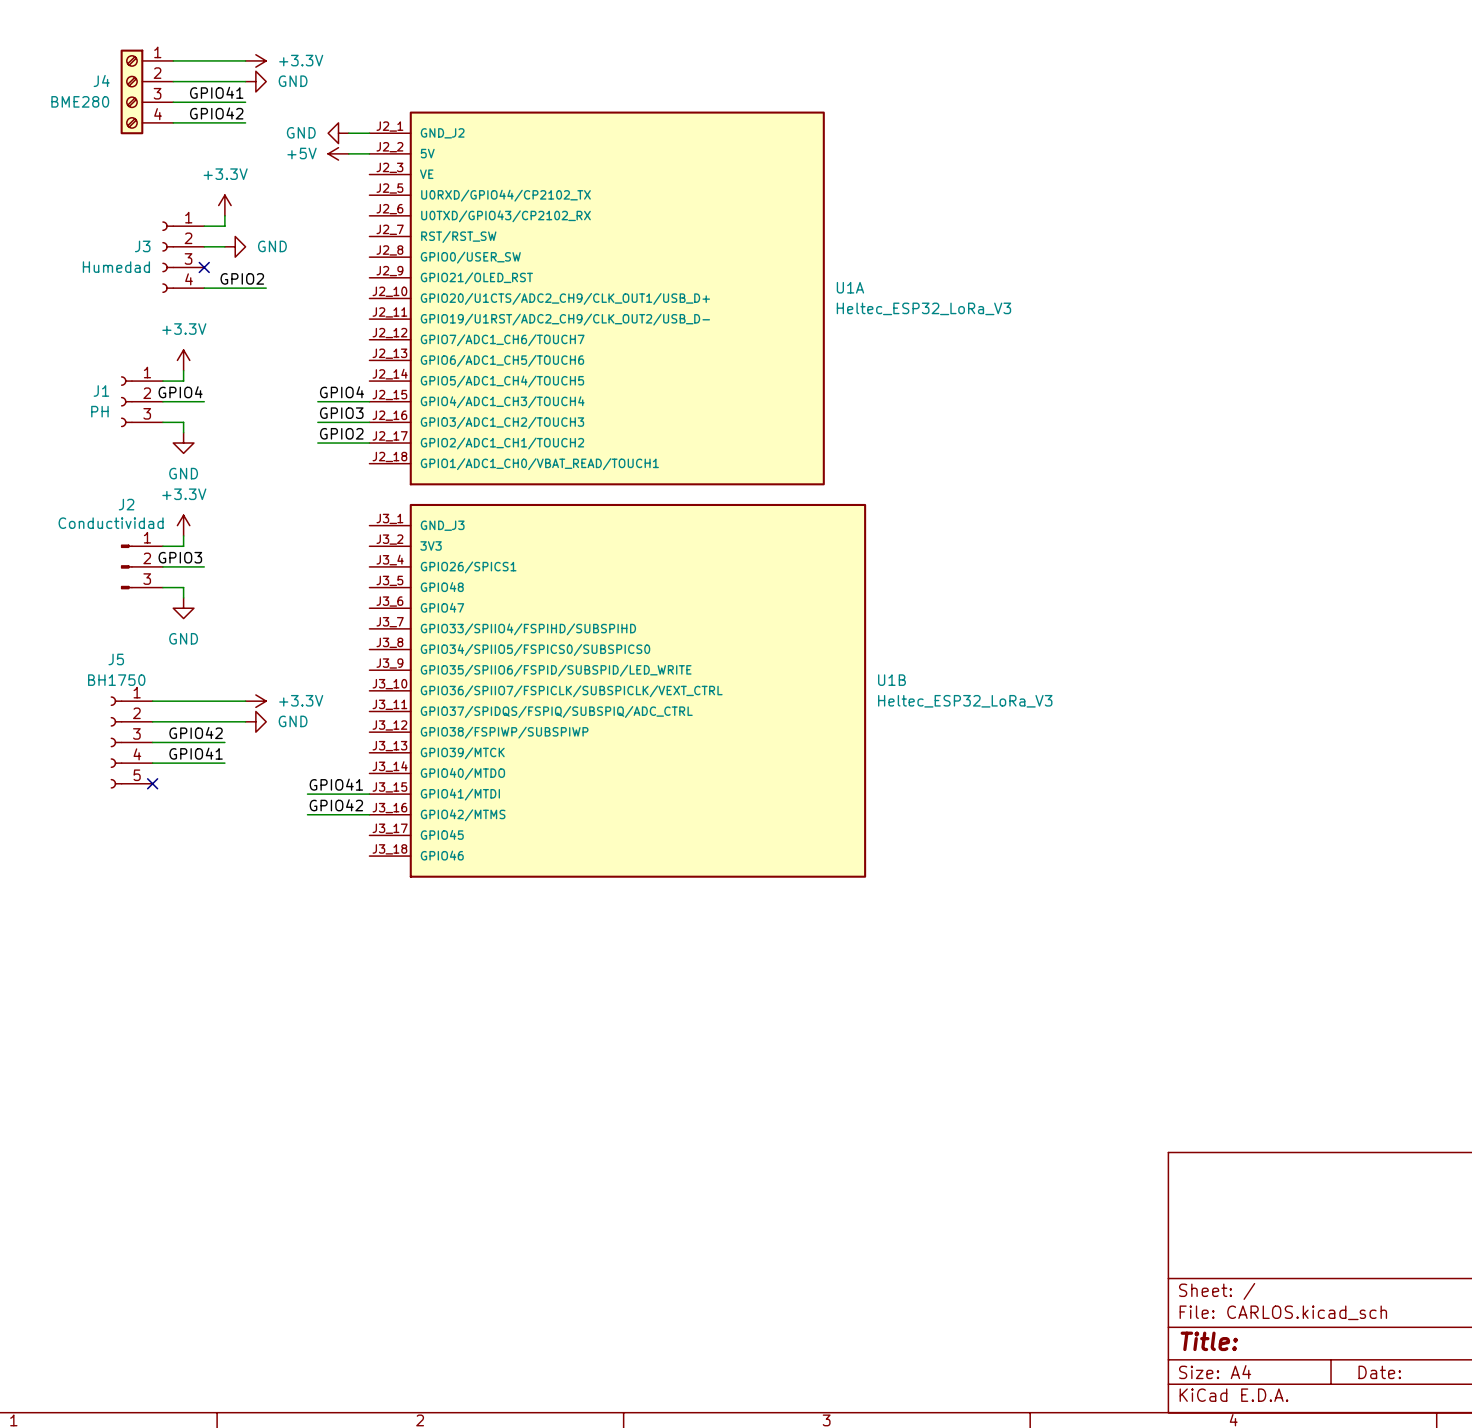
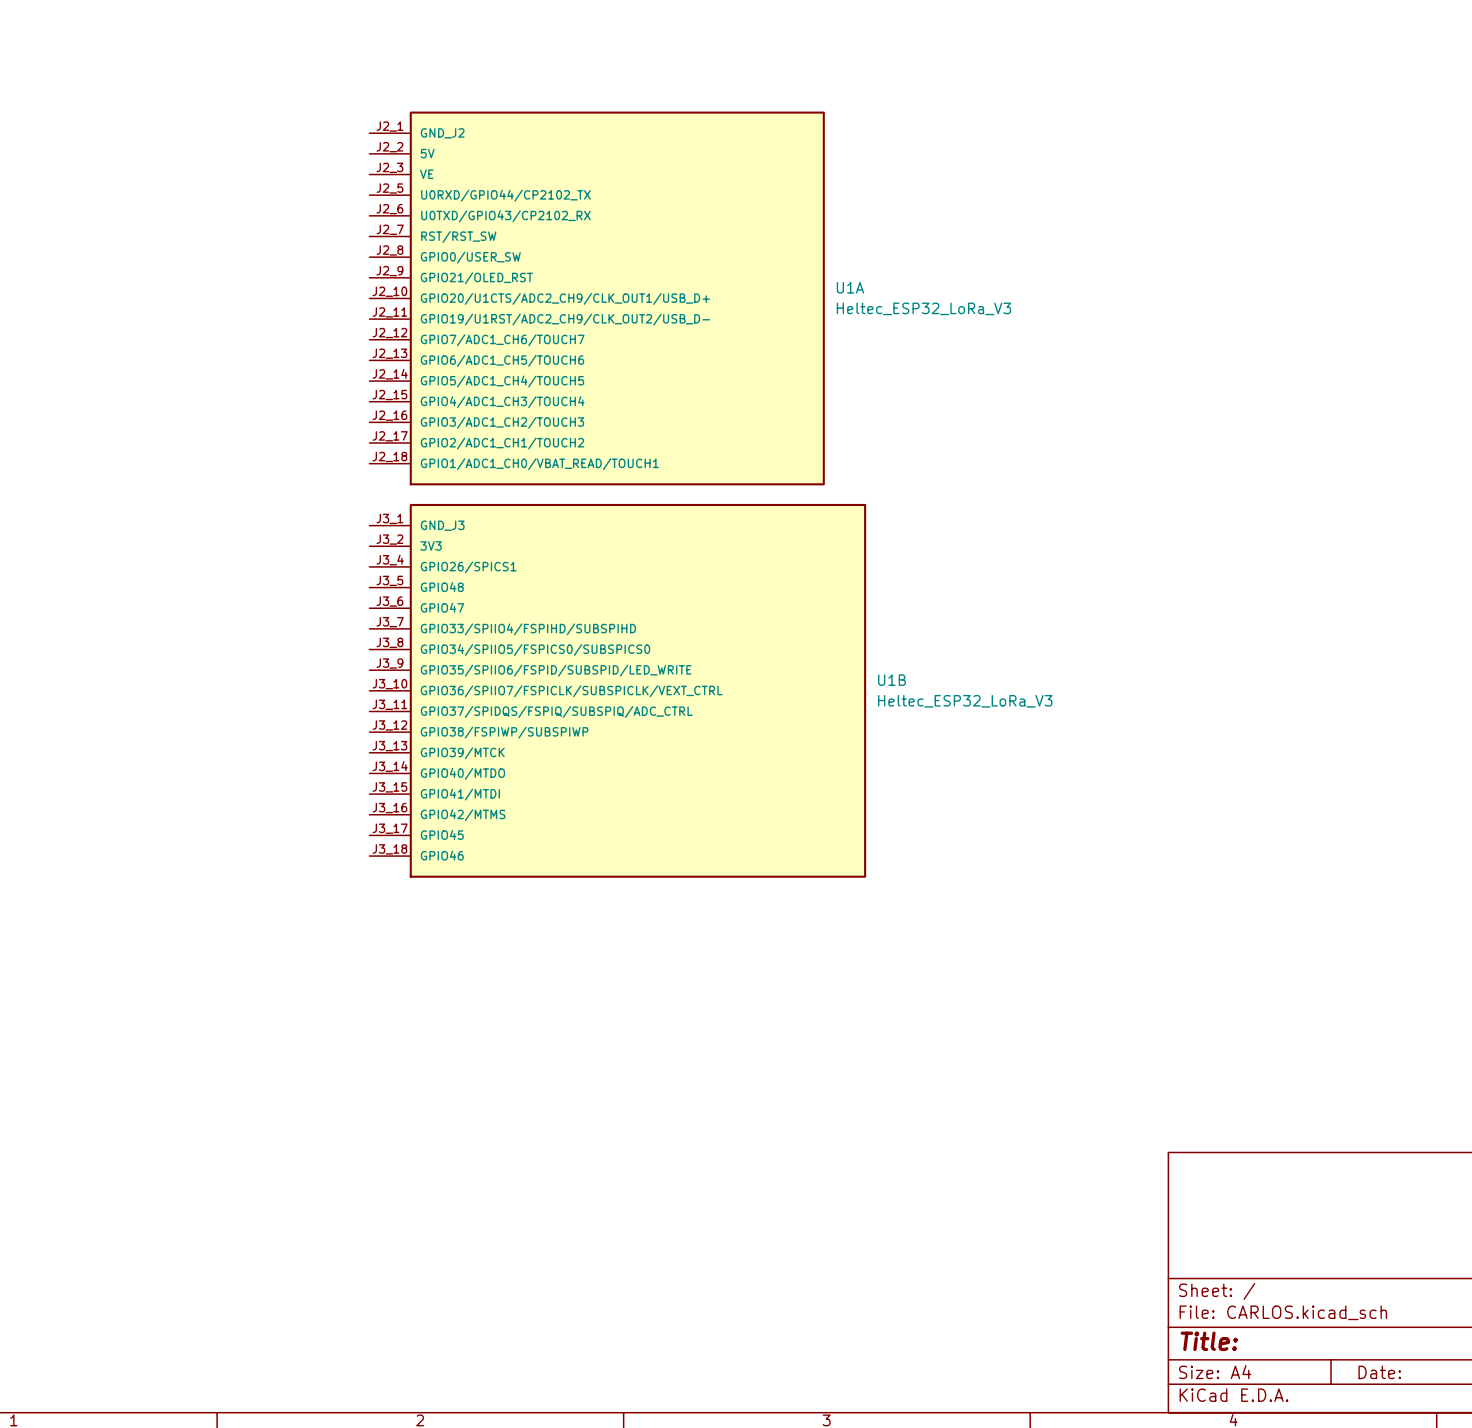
wire: (173, 60) (245, 60) -> none
power symbol: +3.3V (255, 60) -> none
wire: (173, 81) (245, 81) -> none
power symbol: GND (255, 81) -> none
J4: BME280 (146, 91) -> none
label: GPIO41 (216, 92) -> none
wire: (173, 102) (245, 102) -> none
label: GPIO42 (216, 113) -> none
wire: (173, 122) (245, 122) -> none
power symbol: GND (338, 133) -> none
wire: (348, 133) (369, 133) -> none
power symbol: +5V (338, 153) -> none
wire: (348, 153) (369, 153) -> none
power symbol: +3.3V (224, 205) -> none
wire: (224, 215) (224, 226) (204, 226) -> none
wire: (204, 246) (224, 246) -> none
power symbol: GND (235, 246) -> none
J3: Humedad (183, 257) -> none
no-connect mark: (204, 267) -> none
label: GPIO2 (242, 278) -> none
wire: (204, 288) (266, 288) -> none
power symbol: +3.3V (183, 360) -> none
wire: (183, 370) (183, 381) (162, 381) -> none
label: GPIO4 (180, 392) -> none
label: GPIO4 (342, 392) -> none
J1: PH (141, 401) -> none
wire: (162, 401) (204, 401) -> none
wire: (317, 401) (369, 401) -> none
label: GPIO3 (341, 413) -> none
wire: (162, 422) (183, 422) (183, 432) -> none
wire: (317, 422) (369, 422) -> none
label: GPIO2 (341, 433) -> none
power symbol: GND (183, 443) -> none
wire: (317, 443) (369, 443) -> none
power symbol: +3.3V (183, 525) -> none
wire: (183, 535) (183, 546) (162, 546) -> none
label: GPIO3 (180, 557) -> none
J2: Conductividad (141, 566) -> none
wire: (162, 566) (204, 566) -> none
wire: (162, 587) (183, 587) (183, 597) -> none
power symbol: GND (183, 608) -> none
wire: (152, 701) (245, 701) -> none
power symbol: +3.3V (255, 701) -> none
wire: (152, 721) (245, 721) -> none
power symbol: GND (255, 721) -> none
label: GPIO42 (196, 733) -> none
J5: BH1750 (131, 742) -> none
wire: (152, 742) (224, 742) -> none
label: GPIO41 (196, 753) -> none
wire: (152, 763) (224, 763) -> none
no-connect mark: (152, 783) -> none
label: GPIO41 (336, 784) -> none
wire: (307, 794) (369, 794) -> none
label: GPIO42 (336, 805) -> none
wire: (307, 814) (369, 814) -> none

